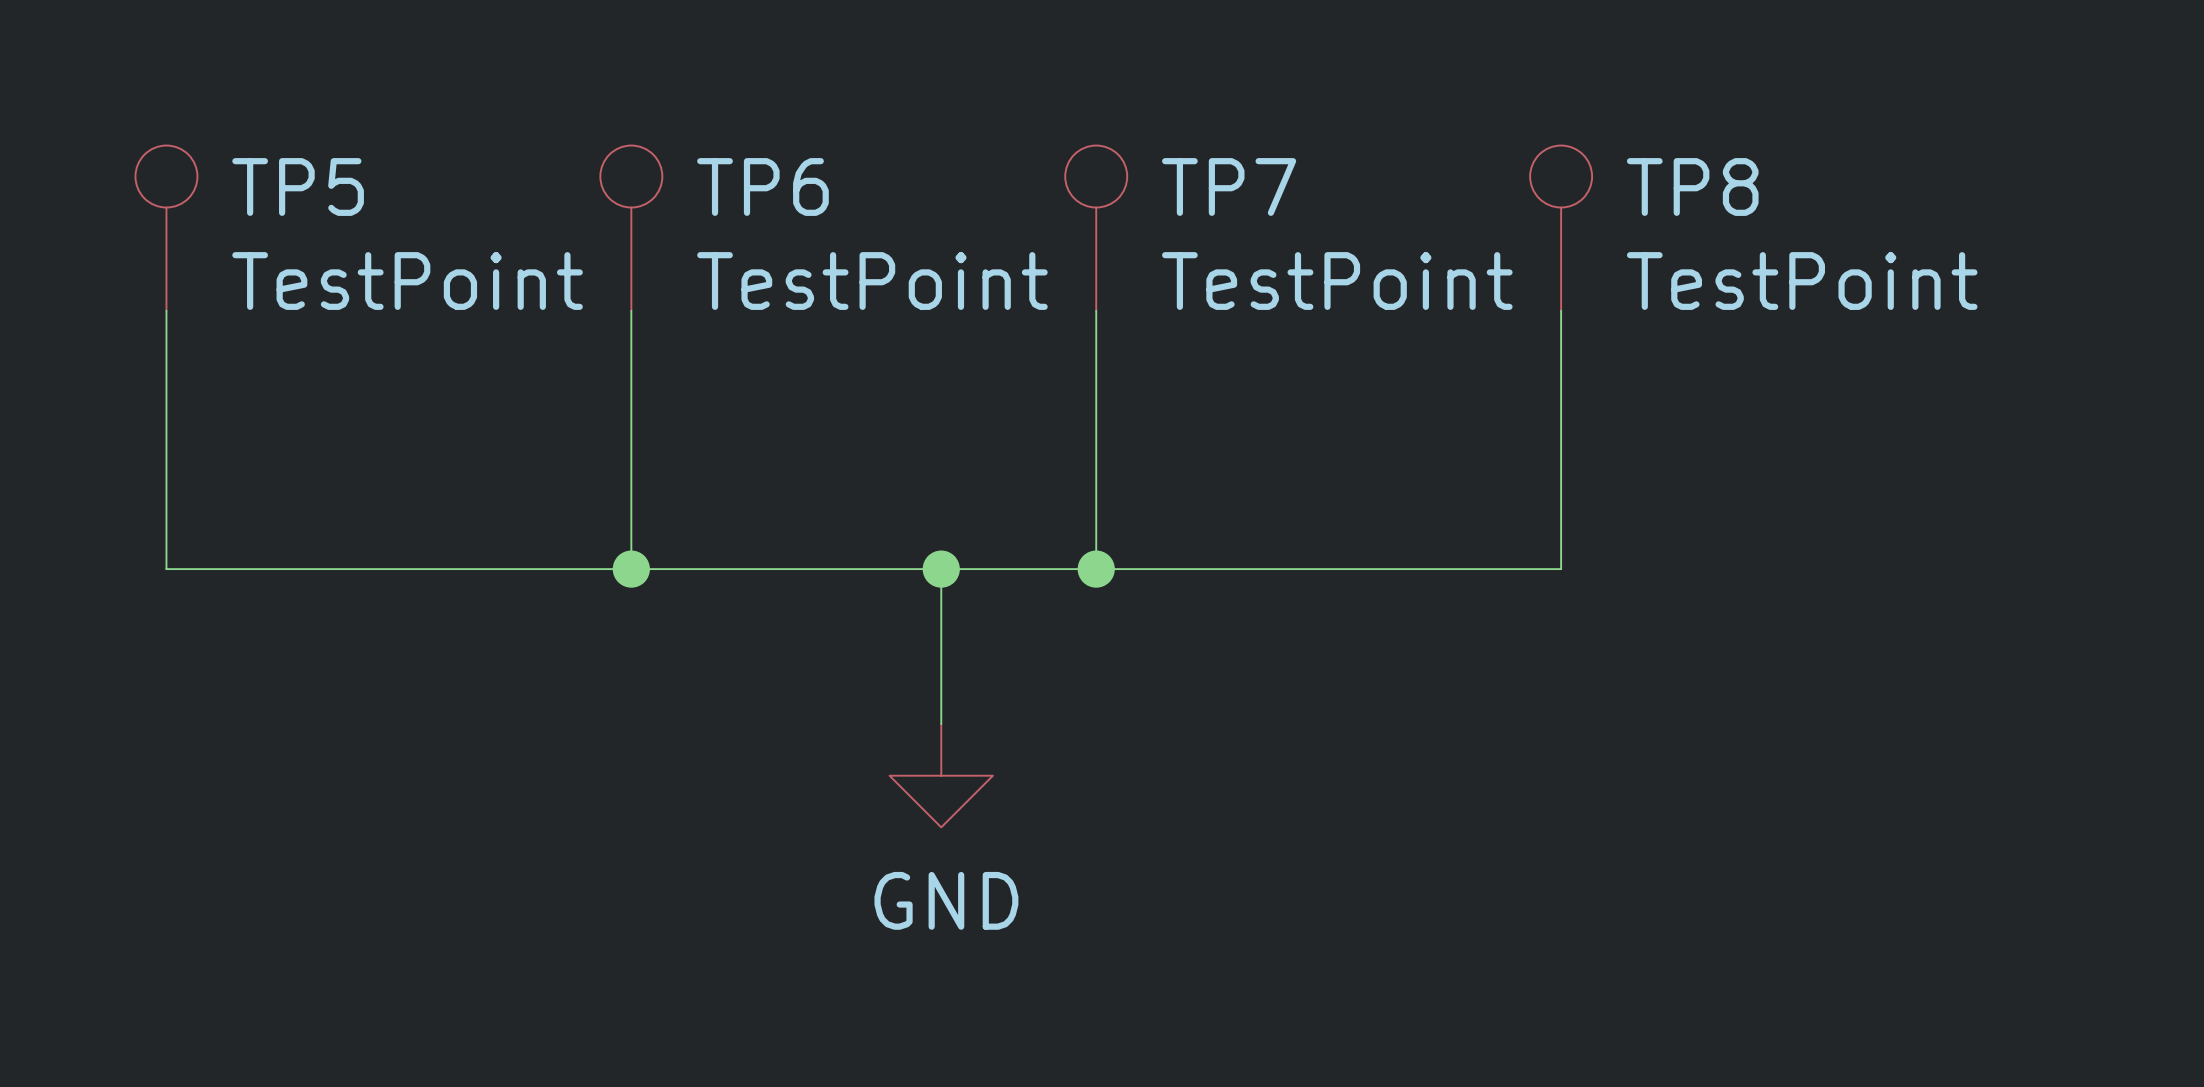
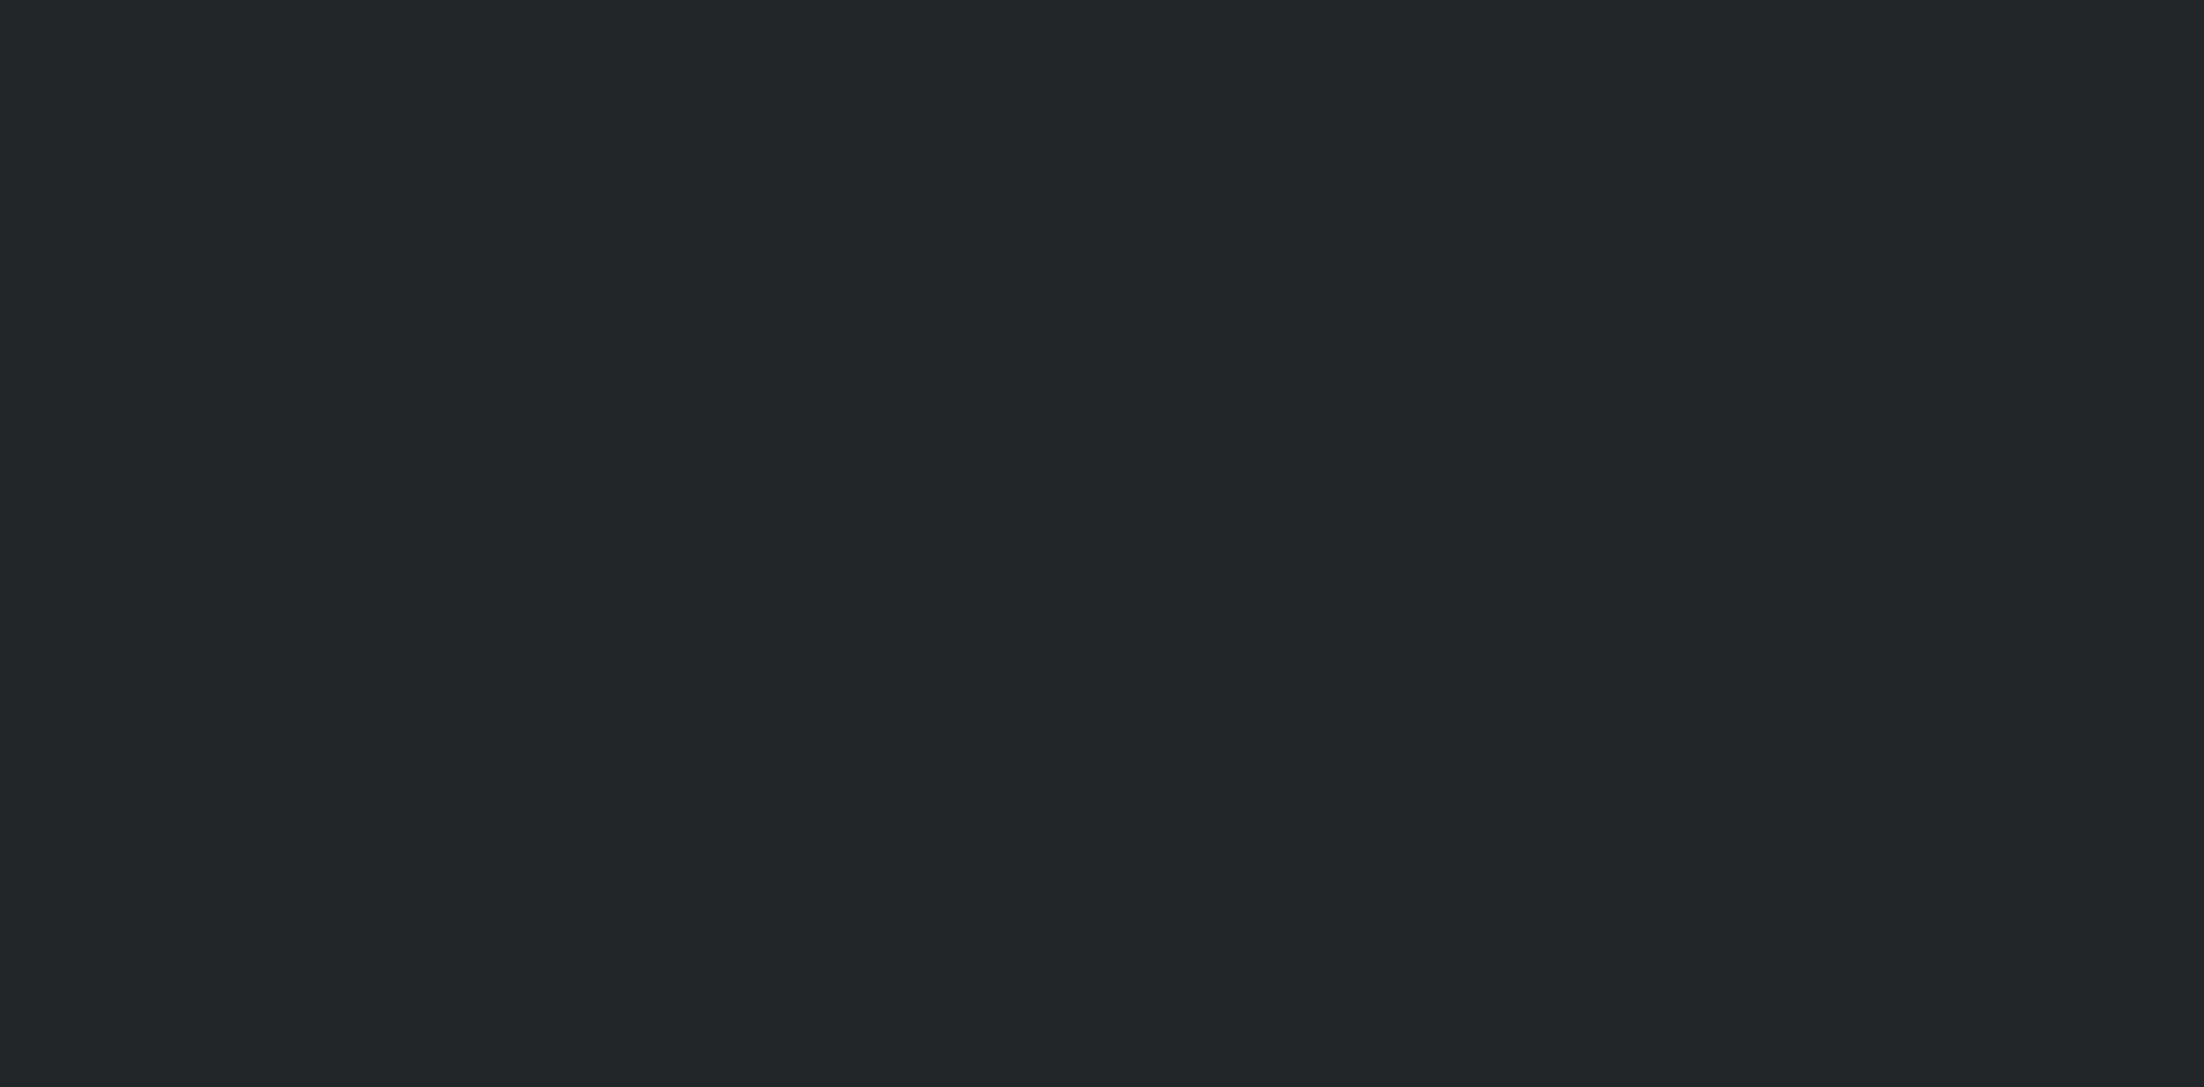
TP5: TestPoint (166, 228) -> none
TP6: TestPoint (631, 228) -> none
TP7: TestPoint (1096, 228) -> none
TP8: TestPoint (1561, 228) -> none
wire: (166, 310) (166, 569) (1561, 569) (1561, 310) -> none
wire: (631, 310) (631, 569) -> none
wire: (1096, 310) (1096, 569) -> none
junction: (631, 569) -> none
wire: (941, 569) (941, 724) -> none
junction: (941, 569) -> none
junction: (1096, 569) -> none
power symbol: GND (941, 775) -> none

